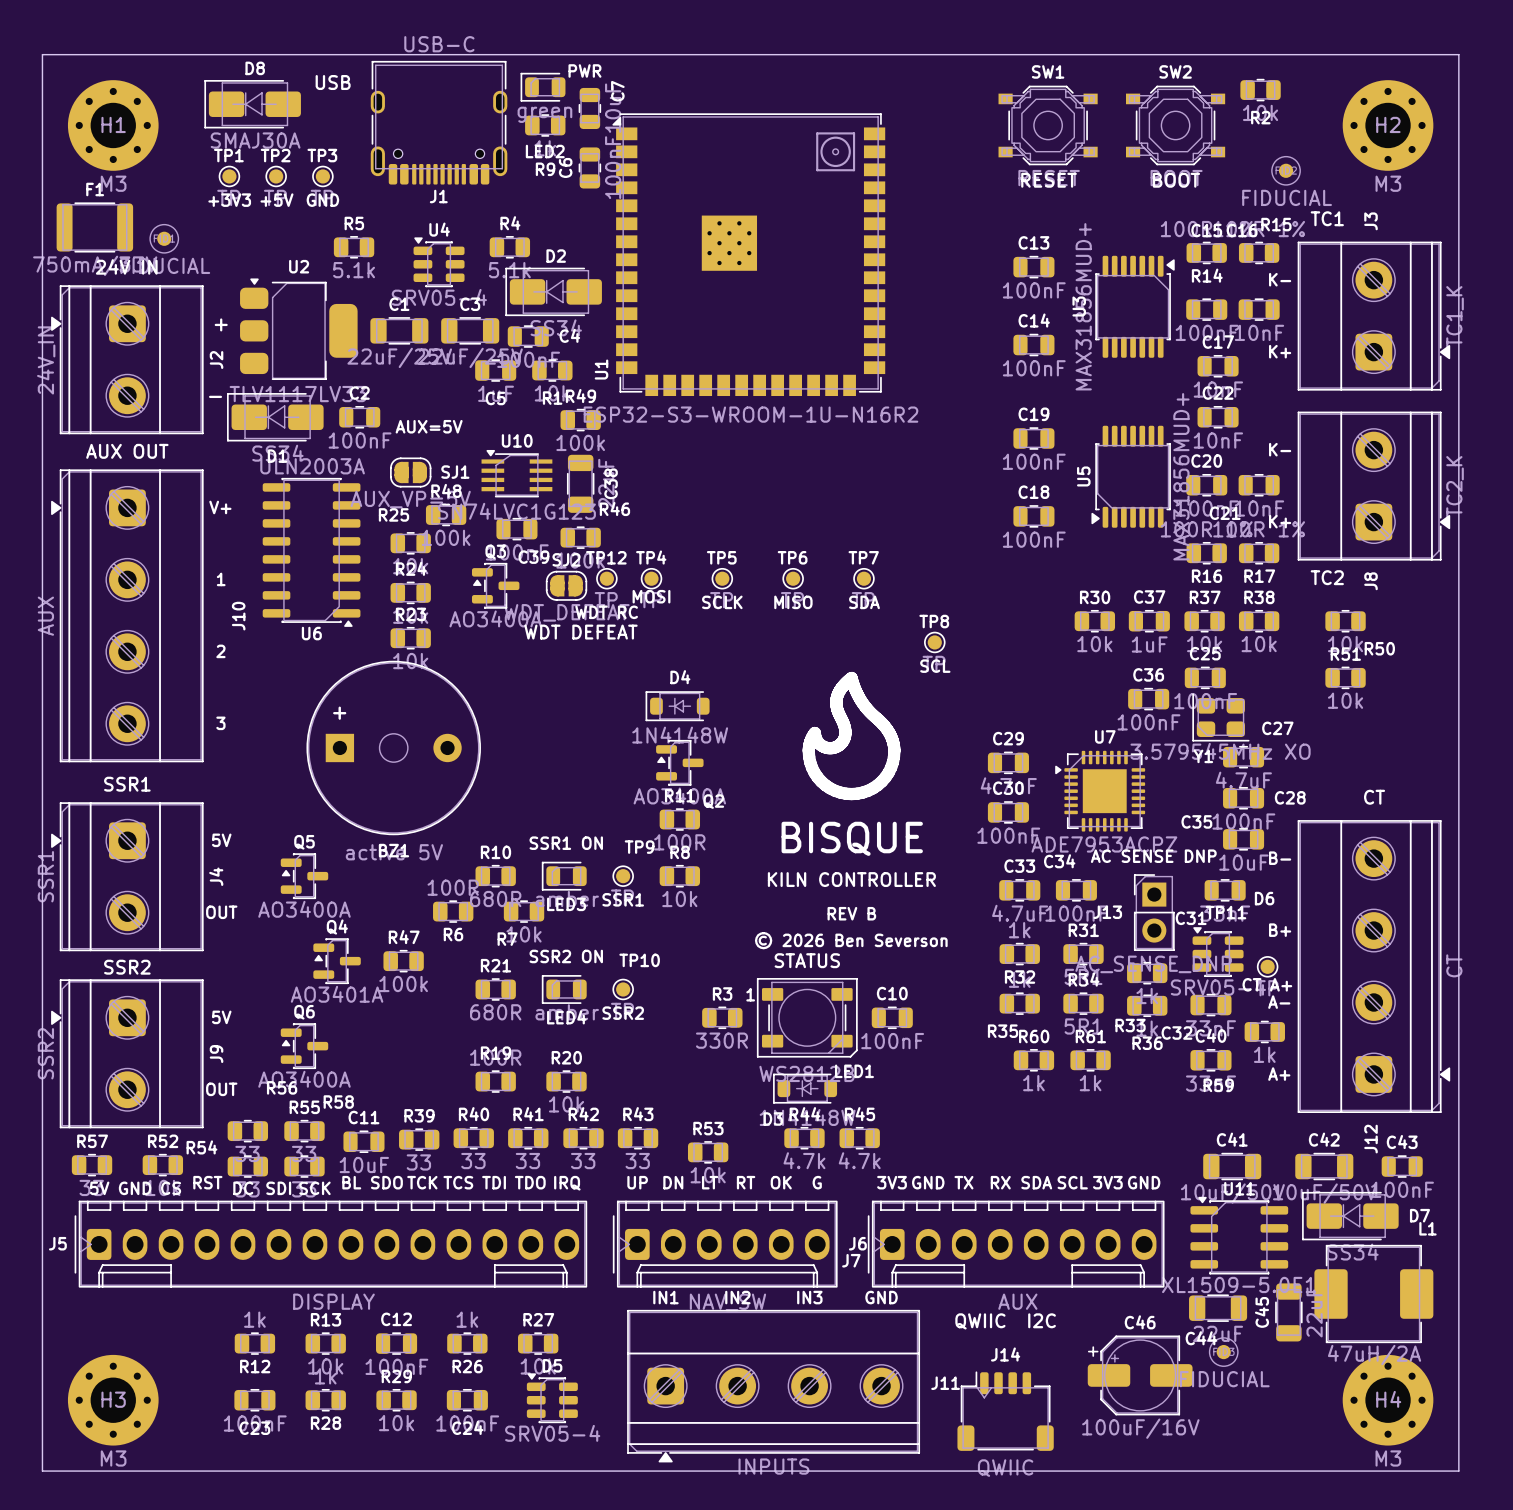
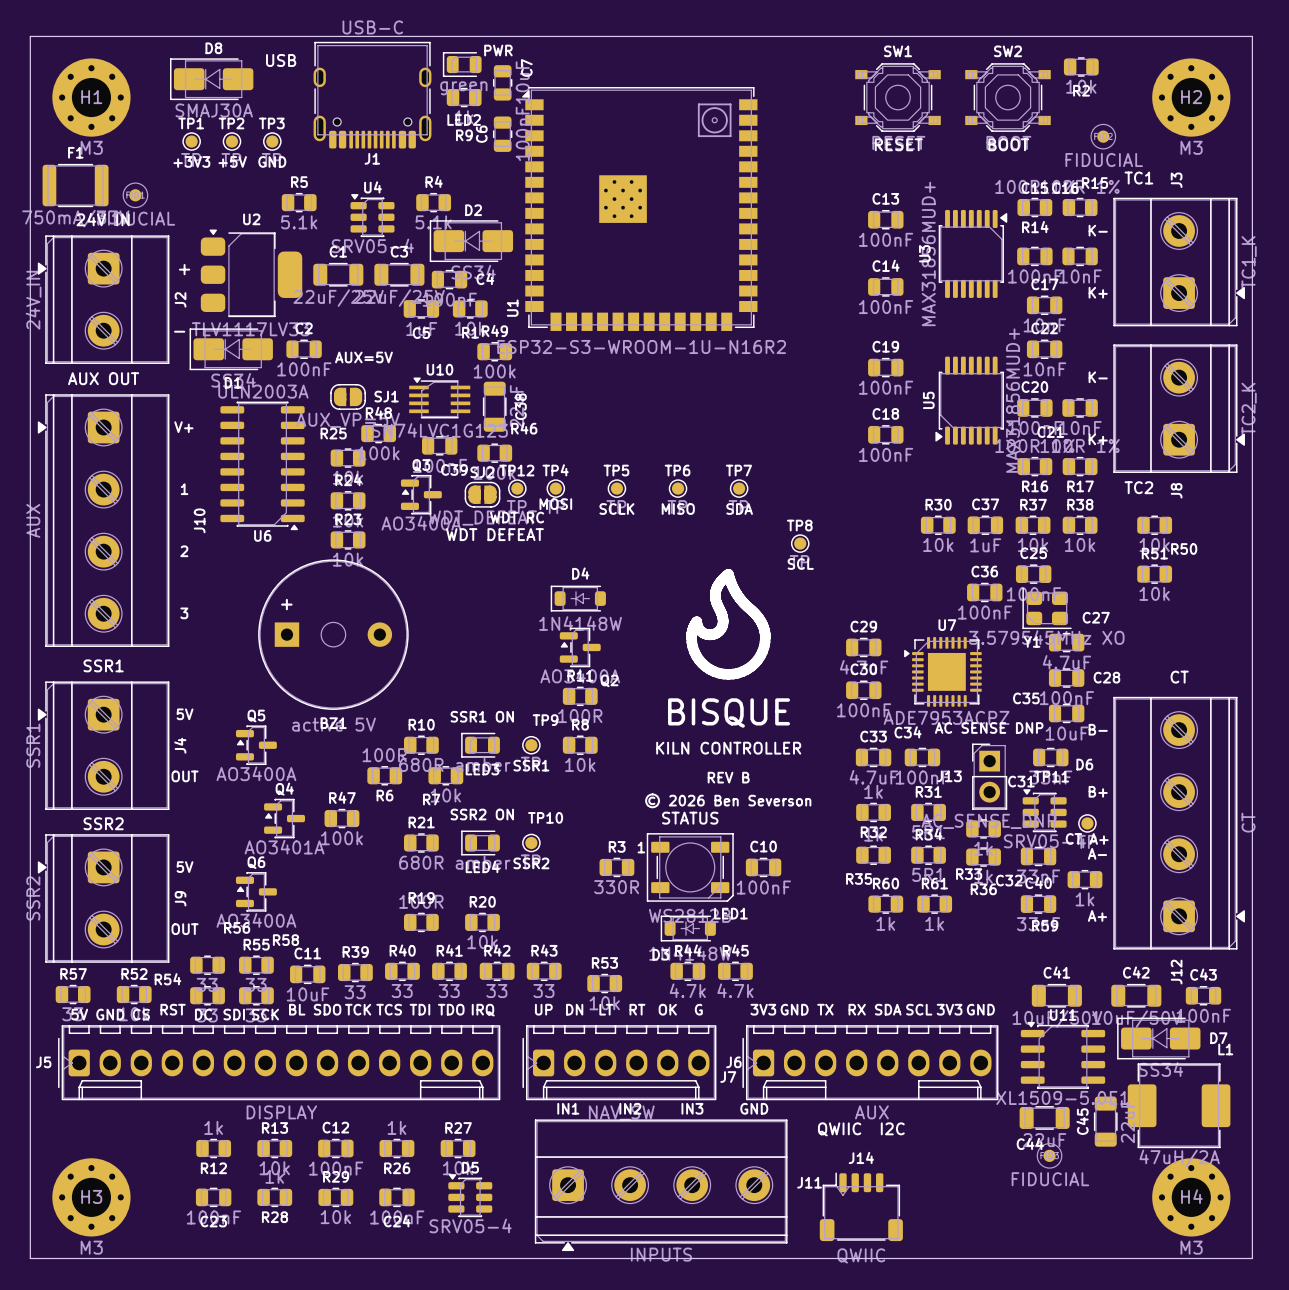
C46: 100uF/16V (1140, 1375) -> none

